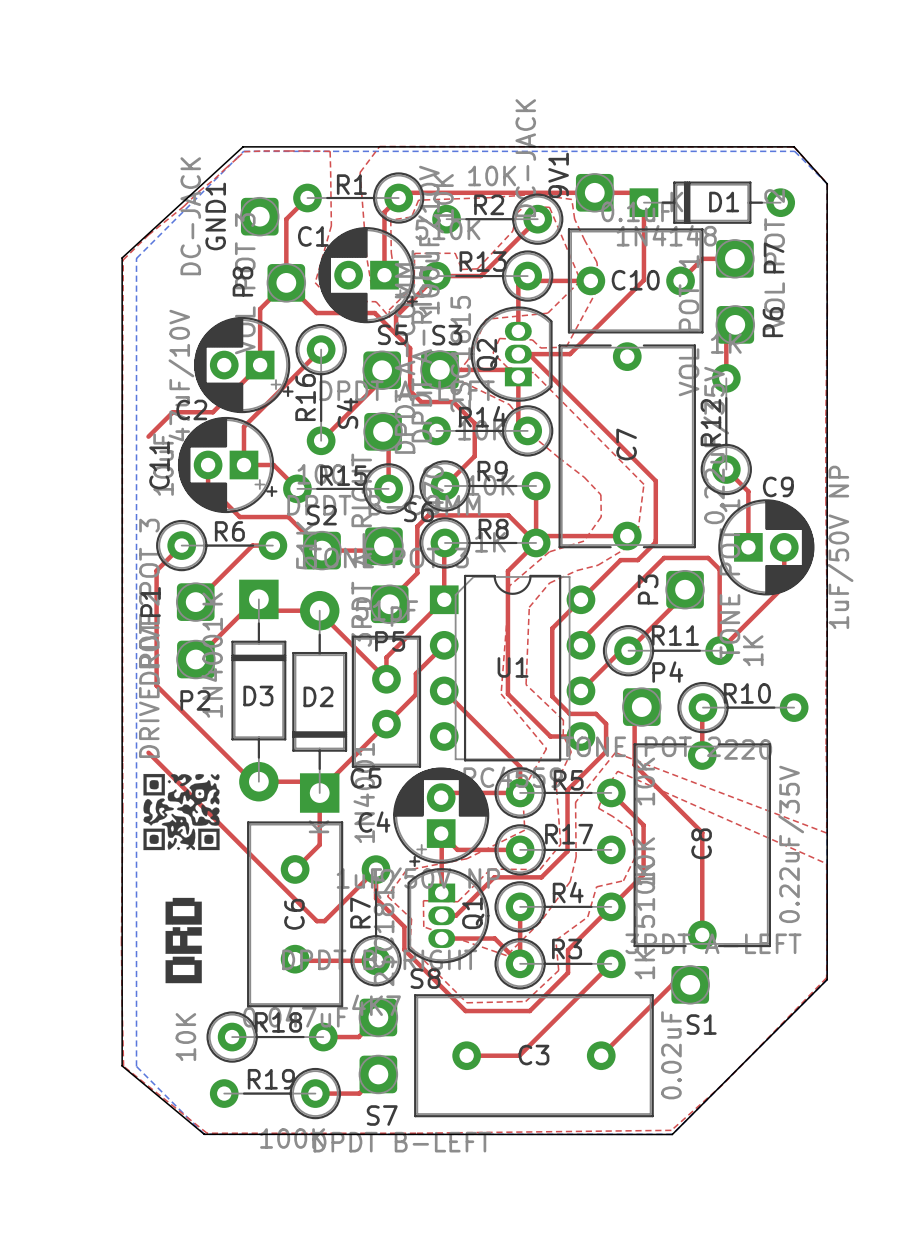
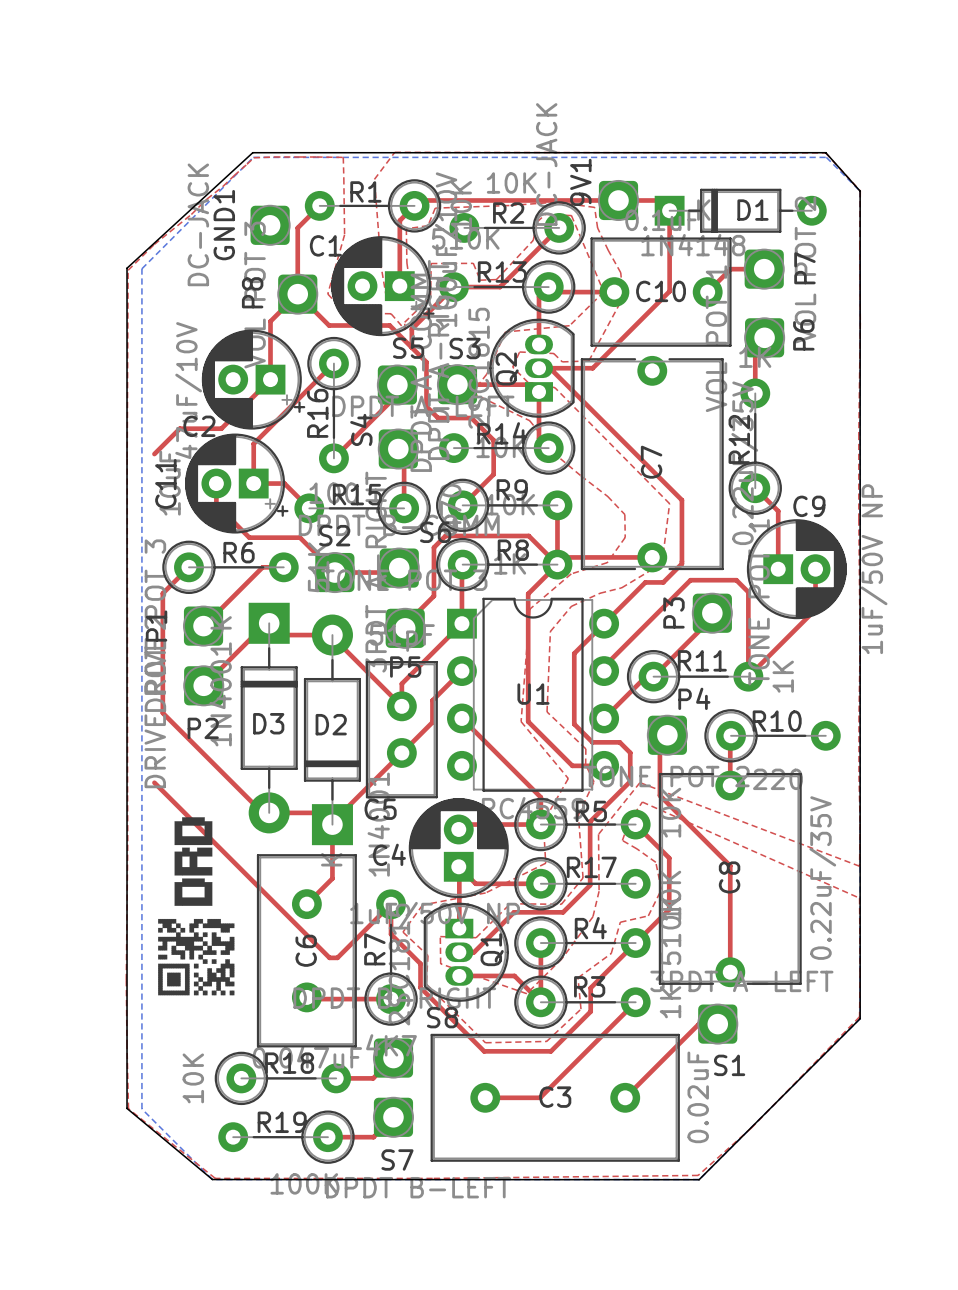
C4 footprint: [393, 767, 490, 868] -> [408, 798, 509, 899]
drawing: [143, 773, 220, 851] -> none
drawing: none -> [158, 918, 235, 996]
drawing position: (183, 940) -> (193, 861)

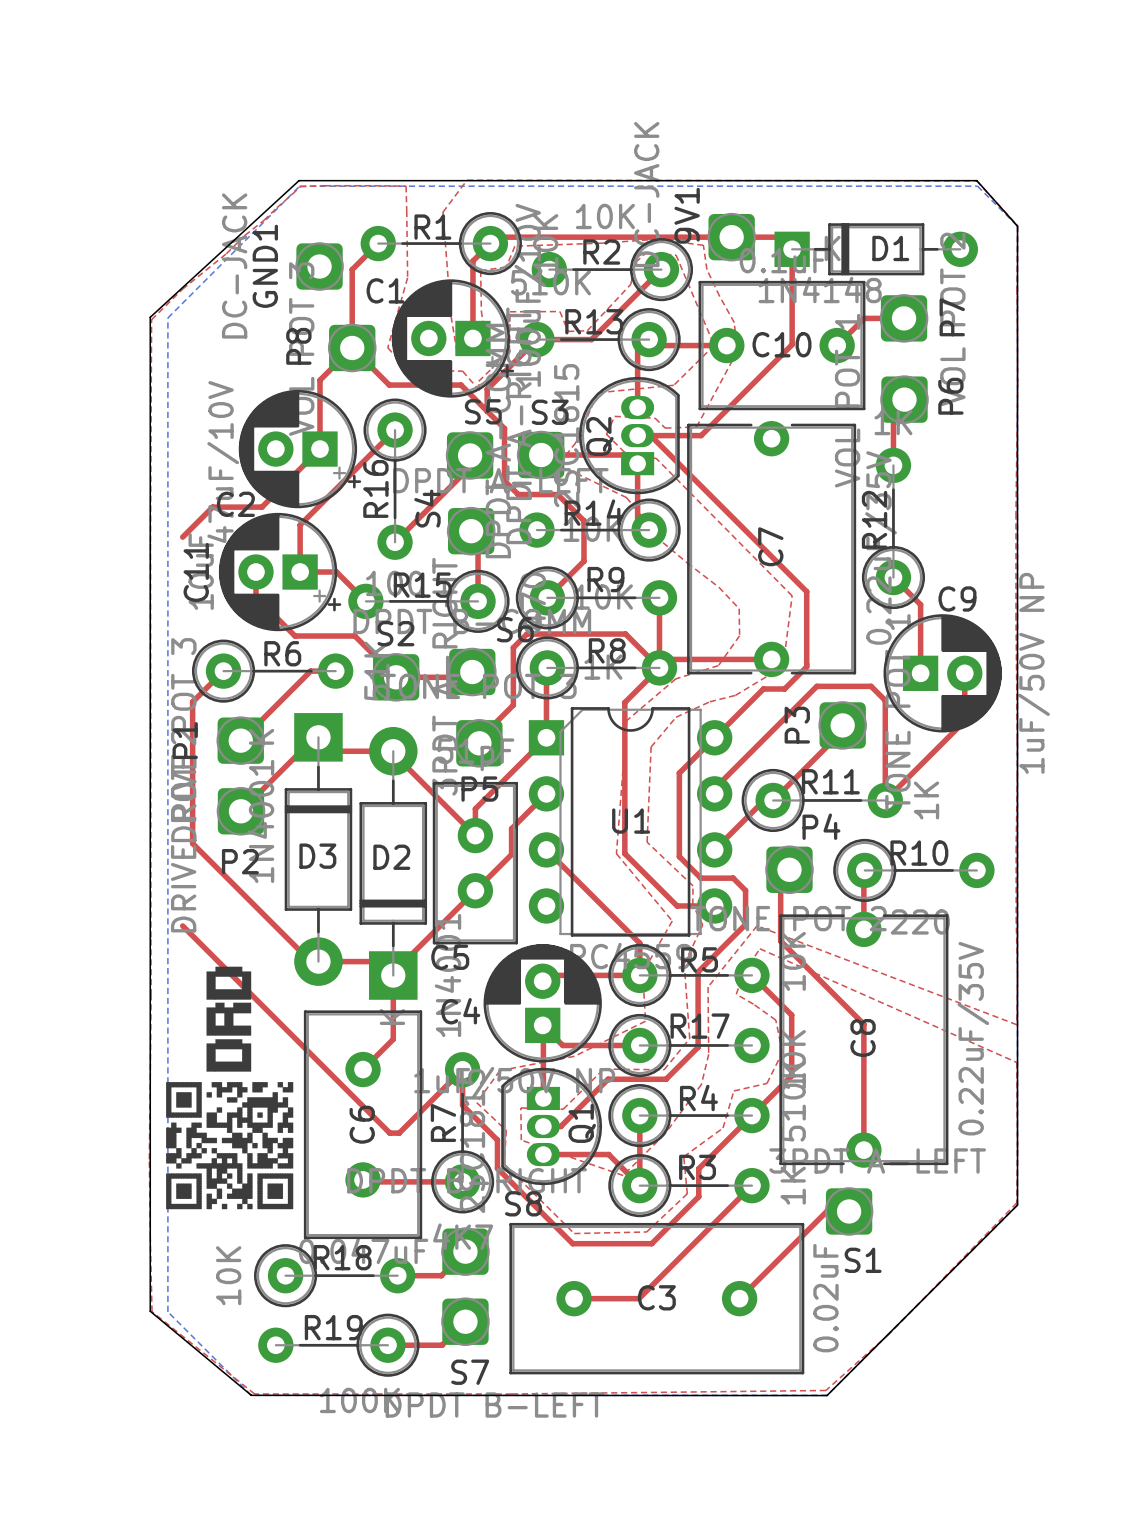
drawing shape: [158, 918, 235, 996] -> [166, 1082, 294, 1210]

